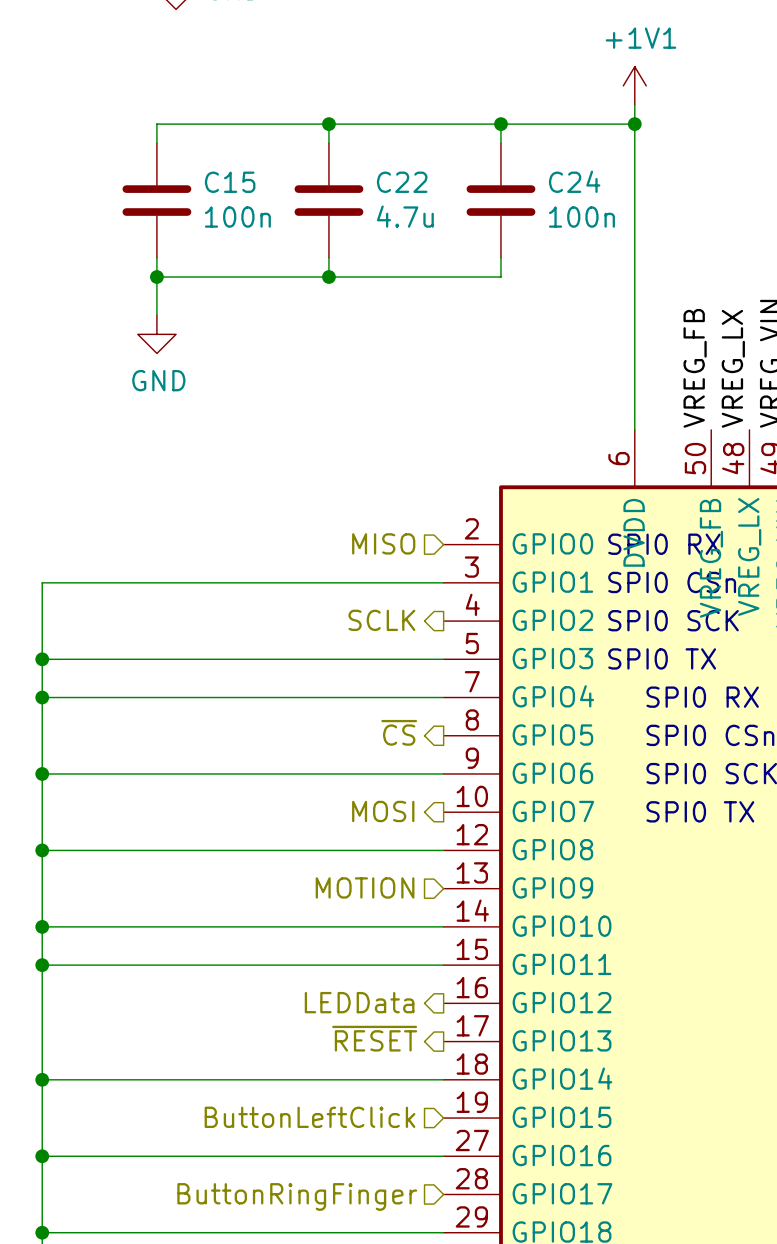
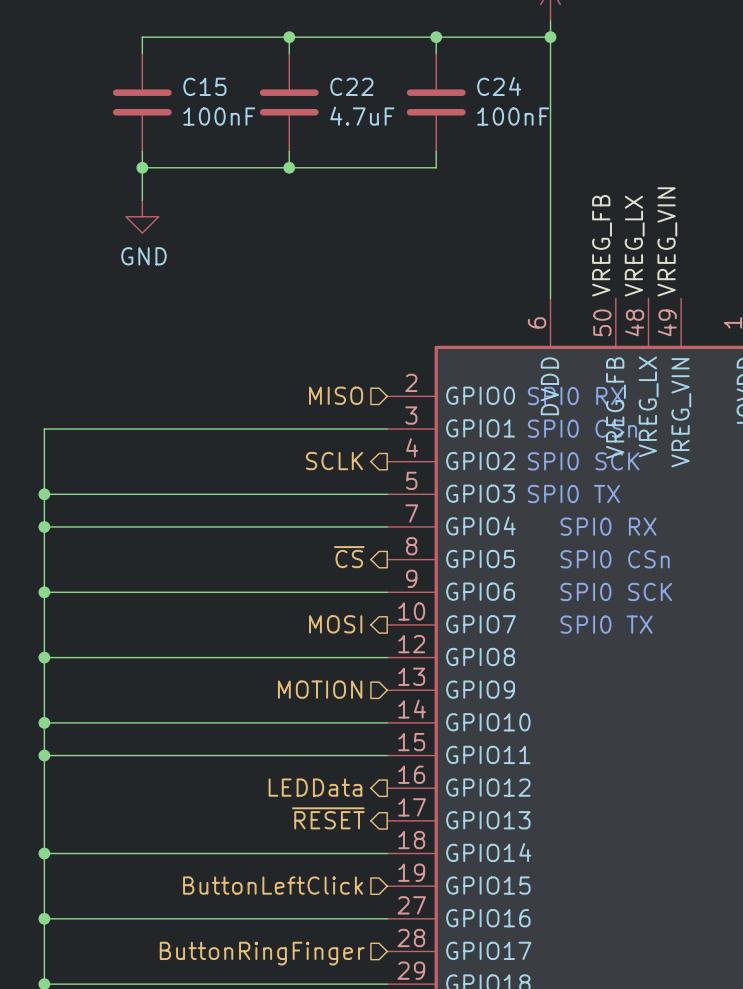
C22 value: 4.7u (405, 216) -> 4.7uF (362, 116)
C15 value: 100n (237, 217) -> 100nF (219, 116)
C24 value: 100n (581, 217) -> 100nF (513, 116)

